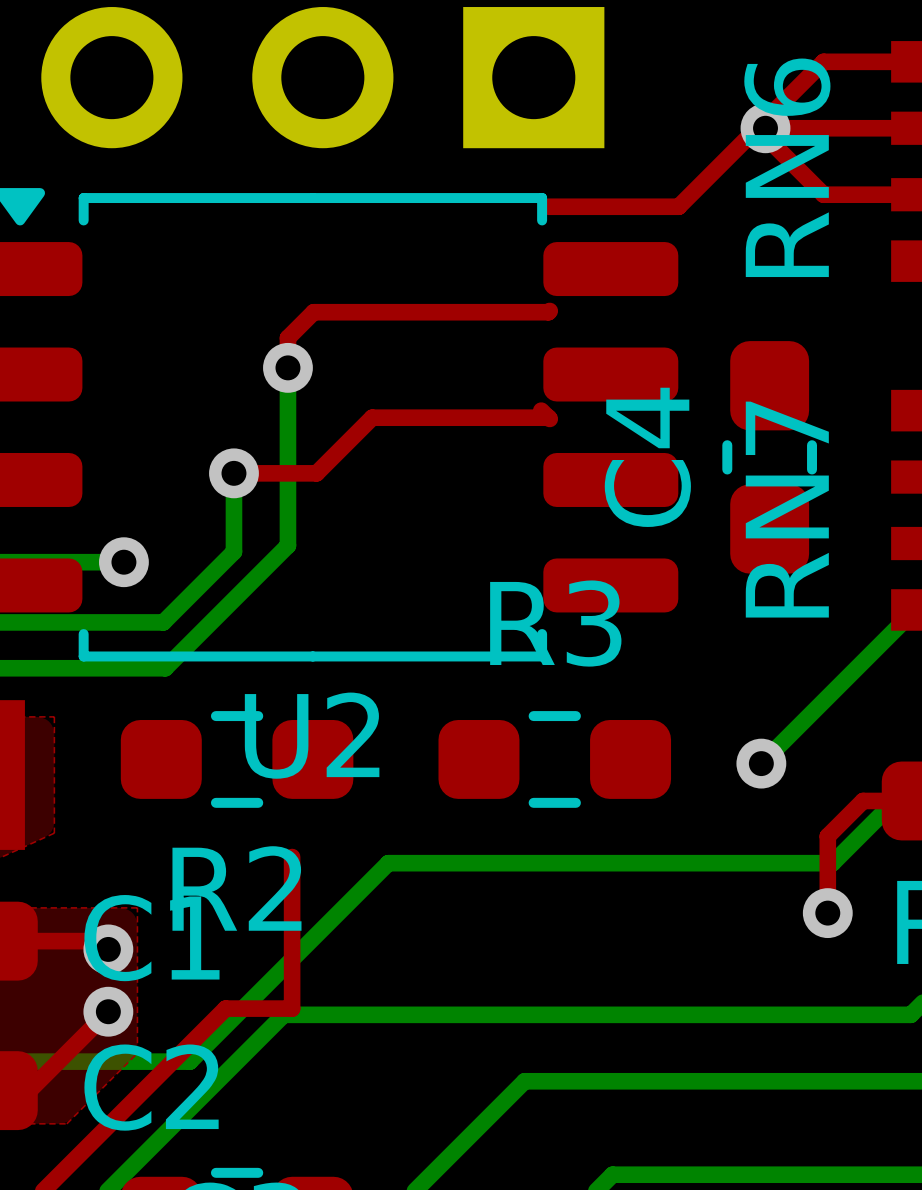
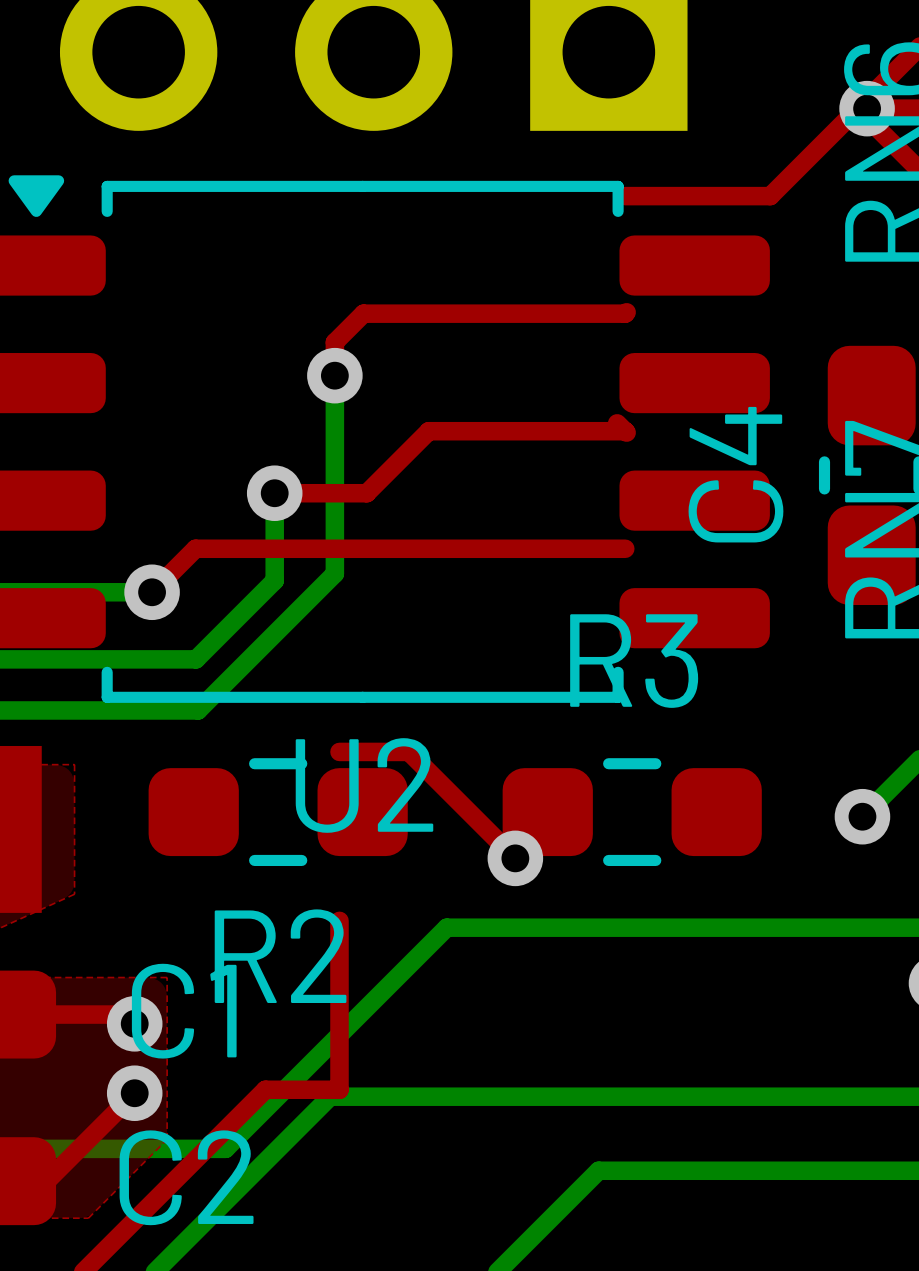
top track: none -> (625, 548) (195, 548) (152, 592)
top track: none -> (339, 751) (408, 751) (515, 858)
via: none -> (515, 858)

